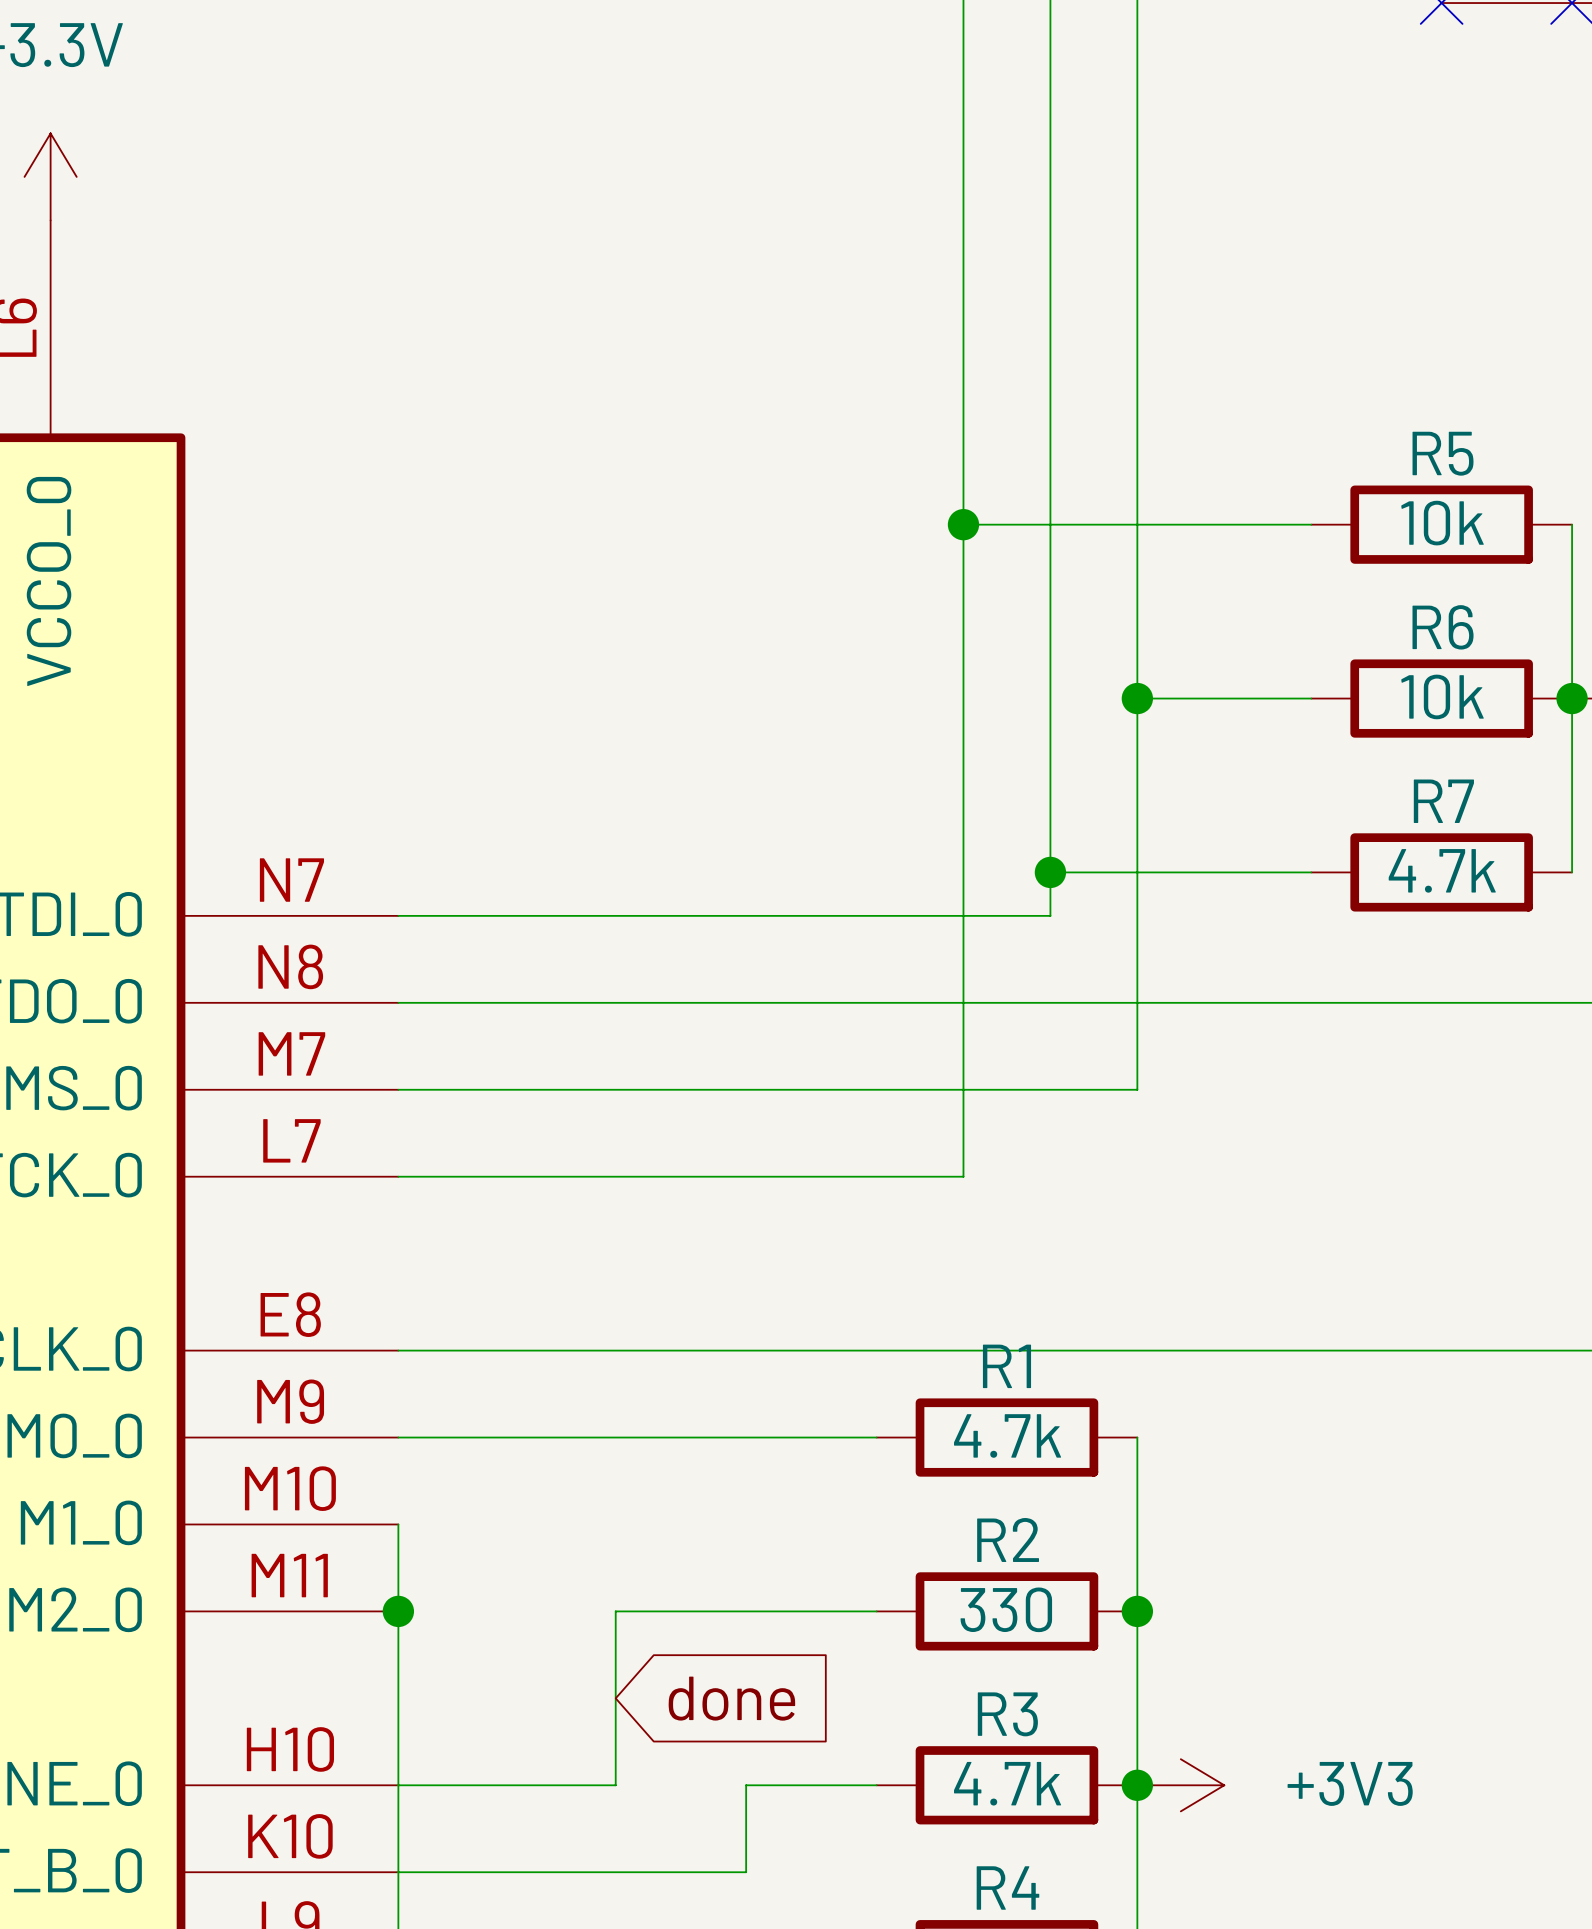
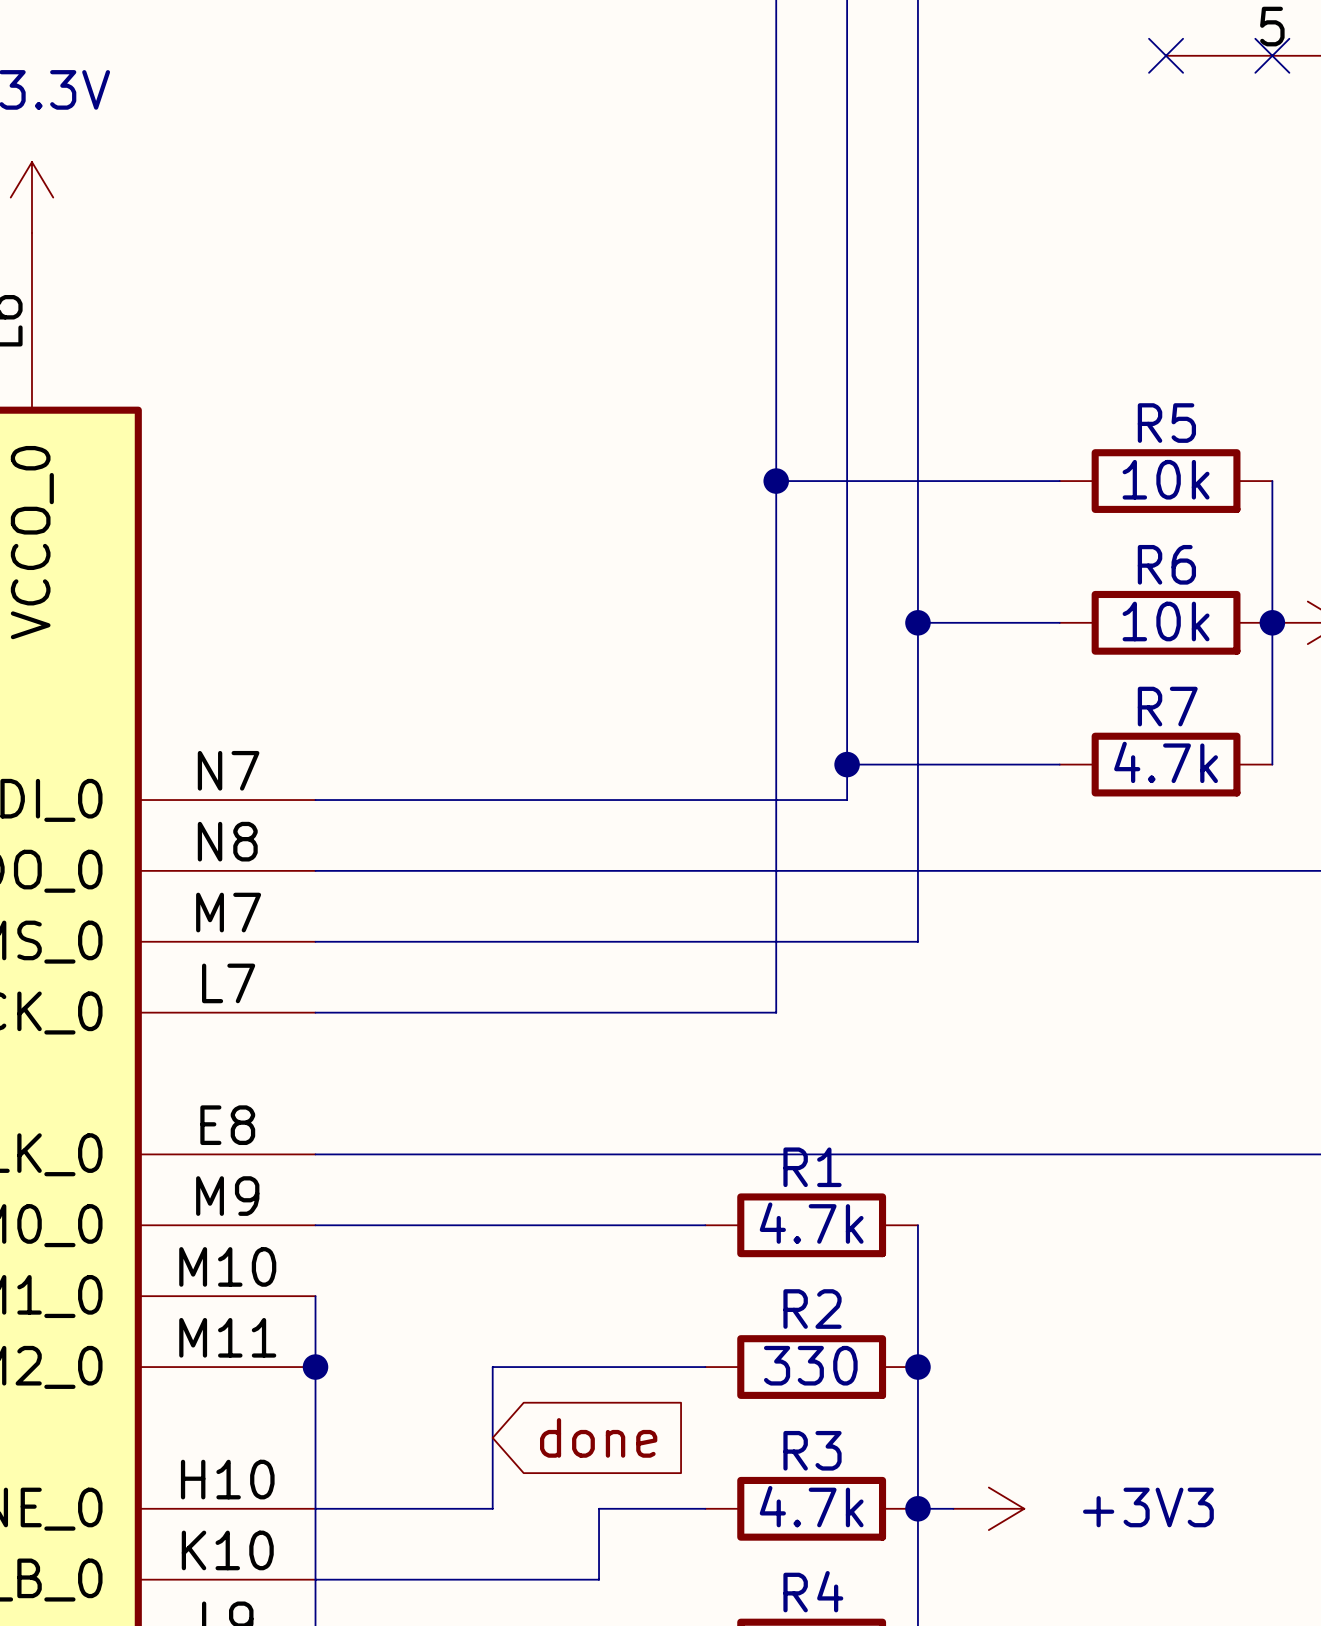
power symbol position: +3V3 (1180, 1785) -> +3V3 (988, 1508)

